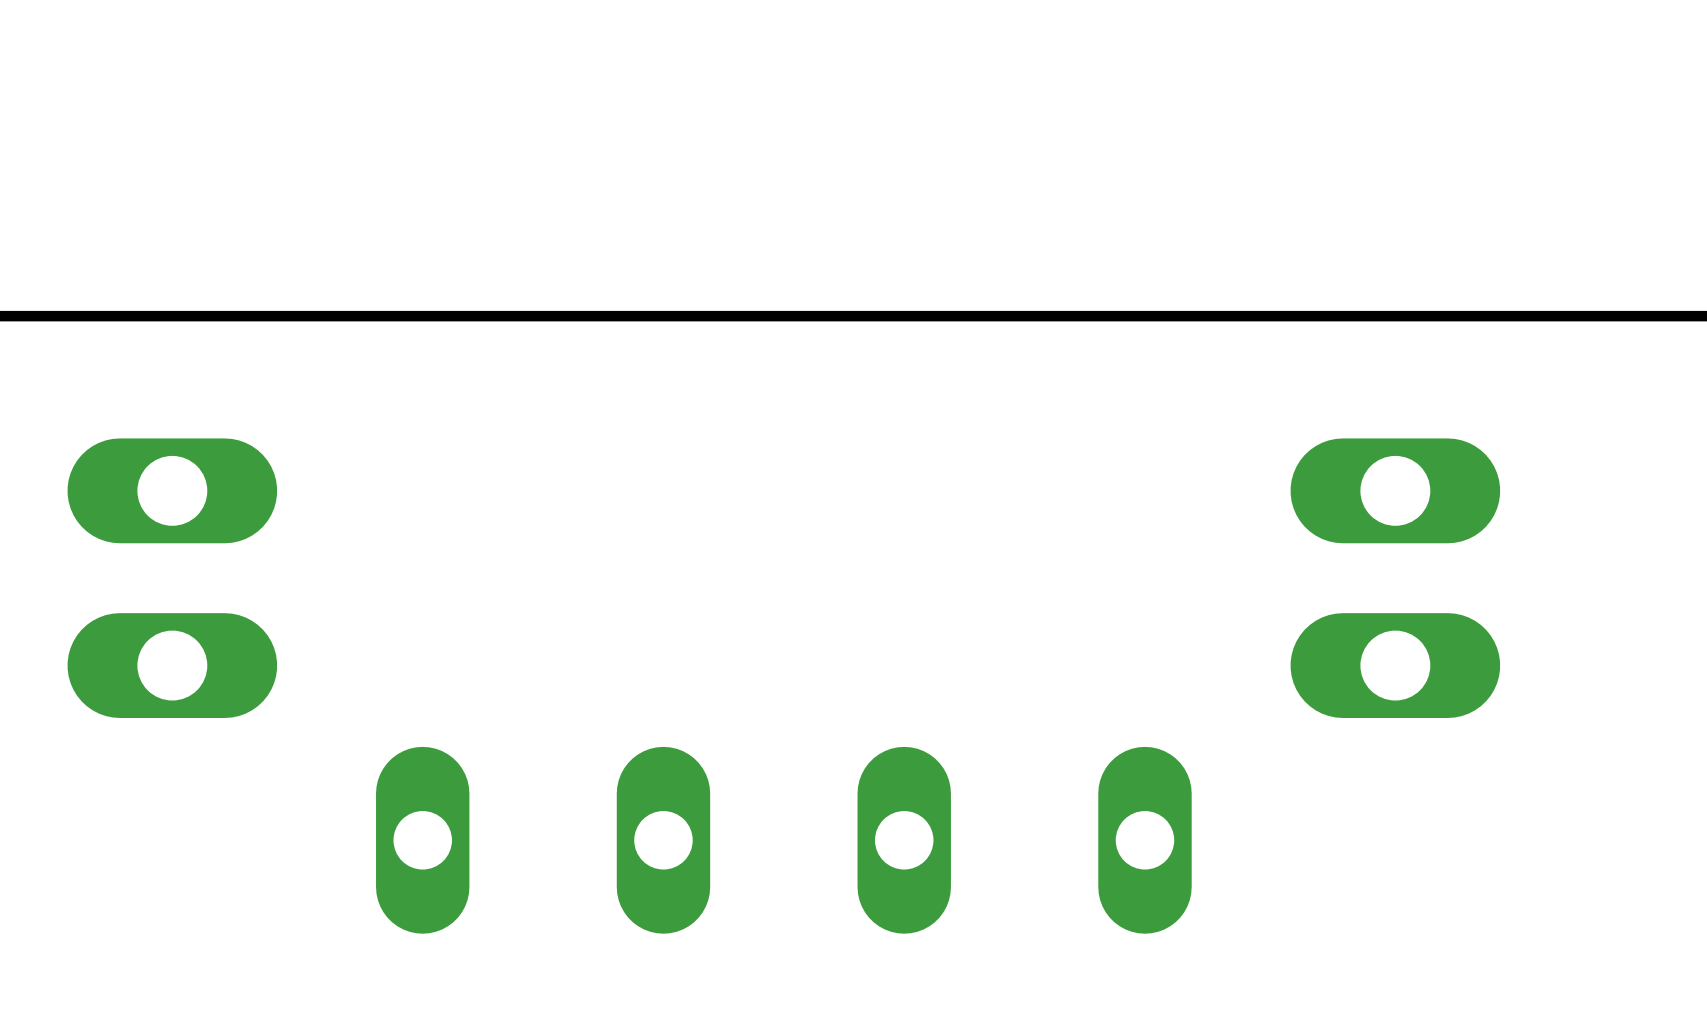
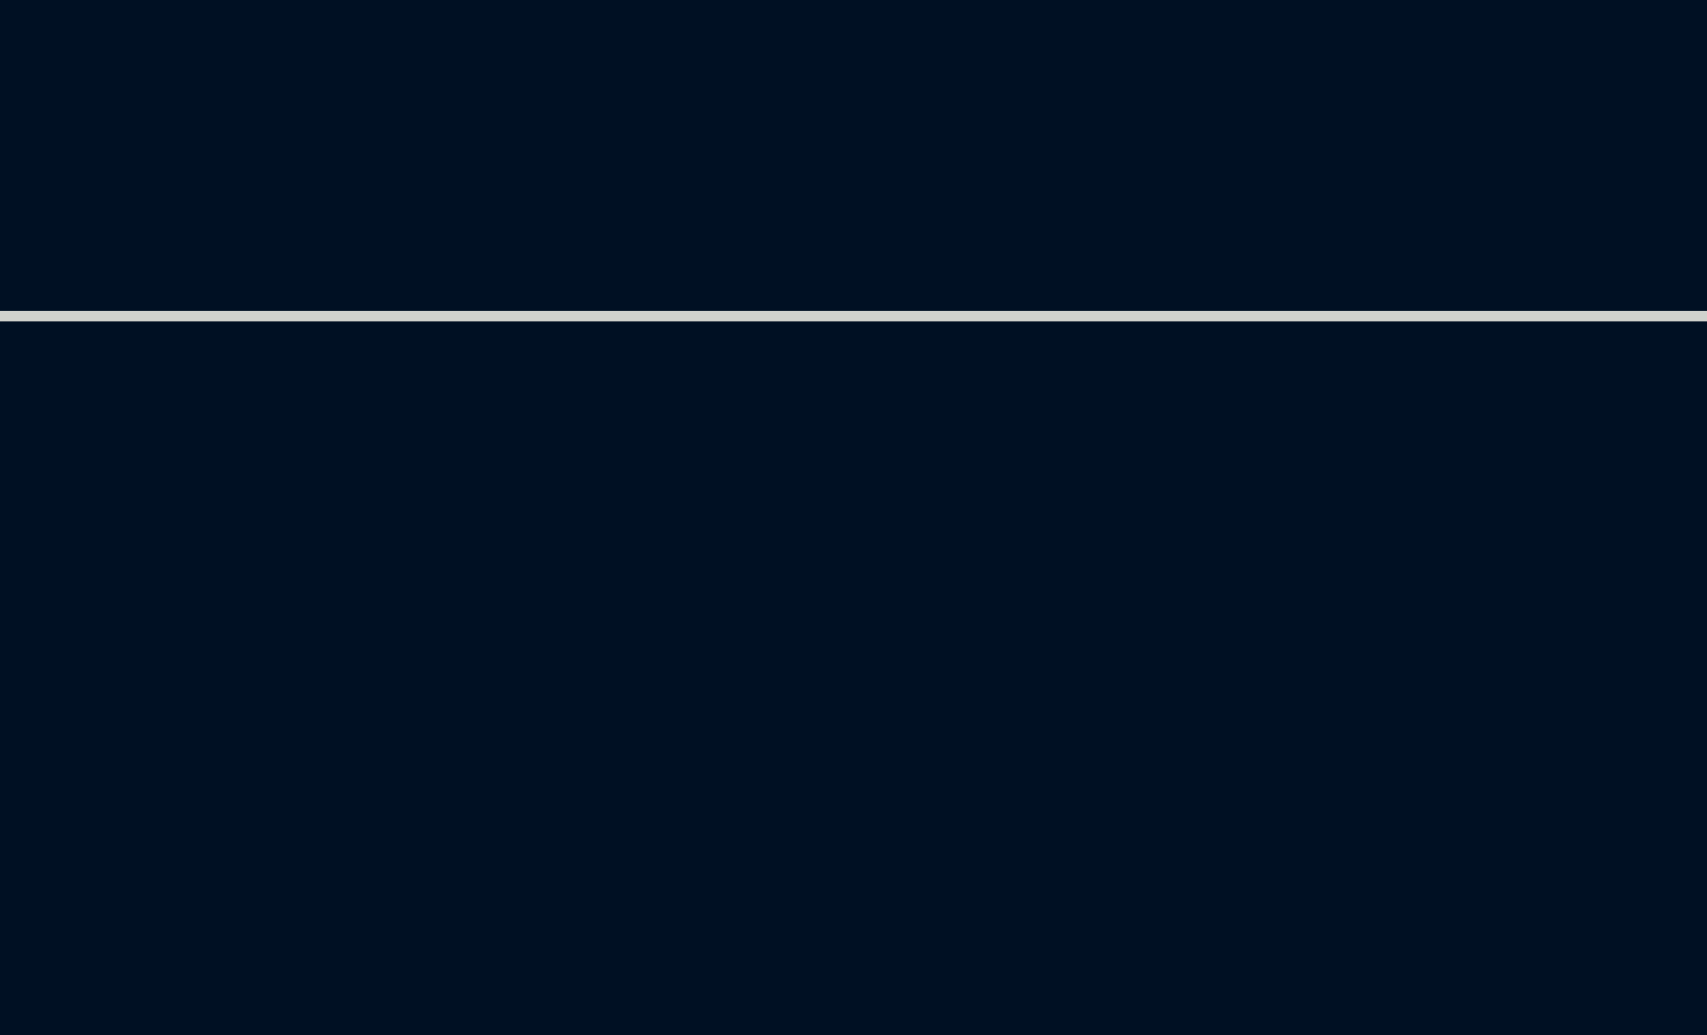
part: (172, 578) -> none
part: (1395, 578) -> none
part: (783, 840) -> none

